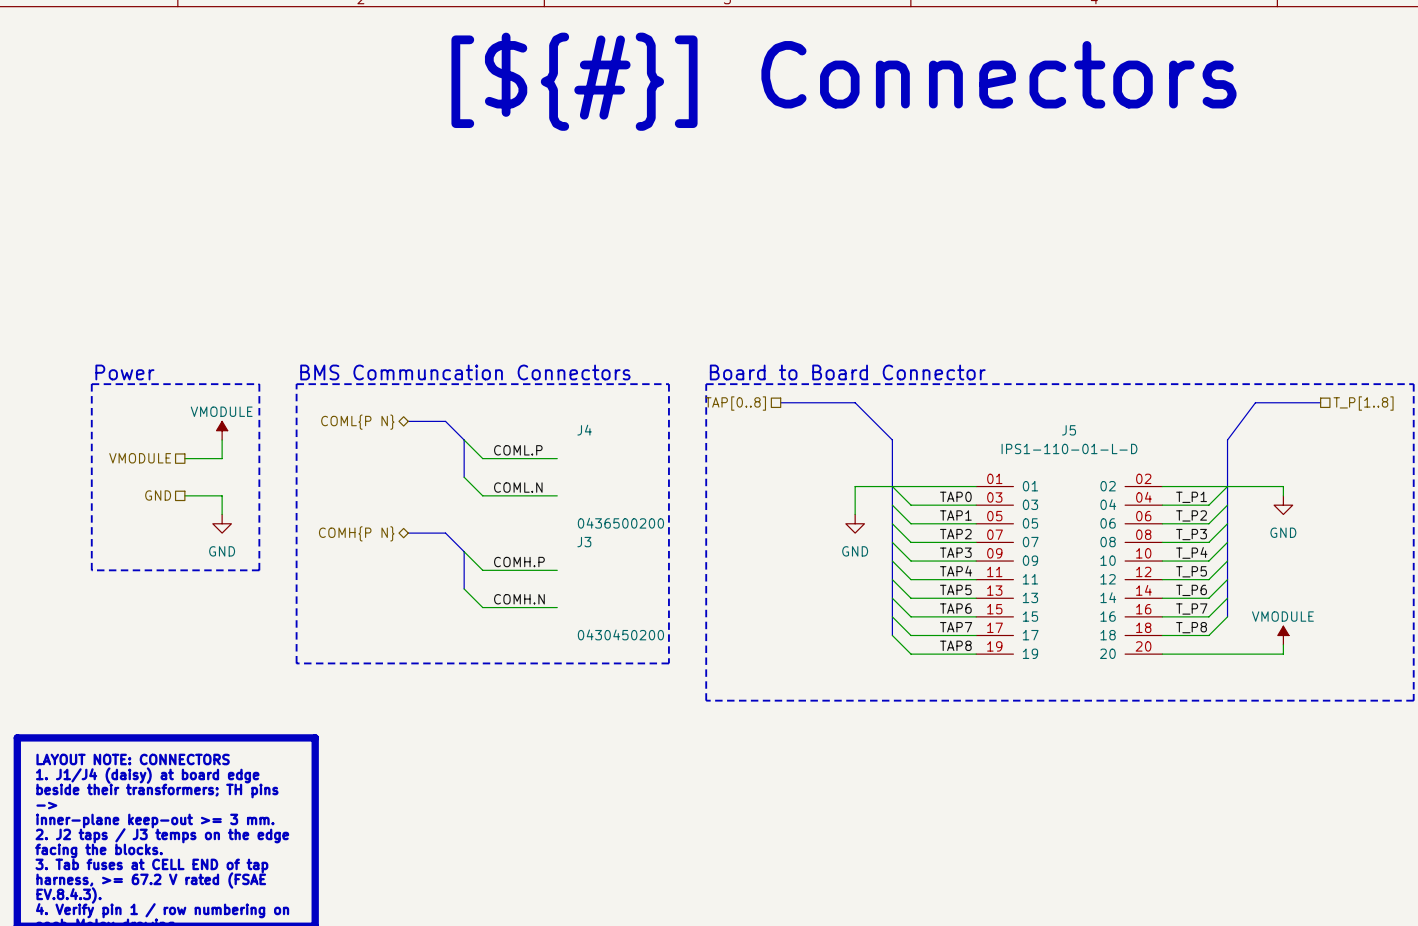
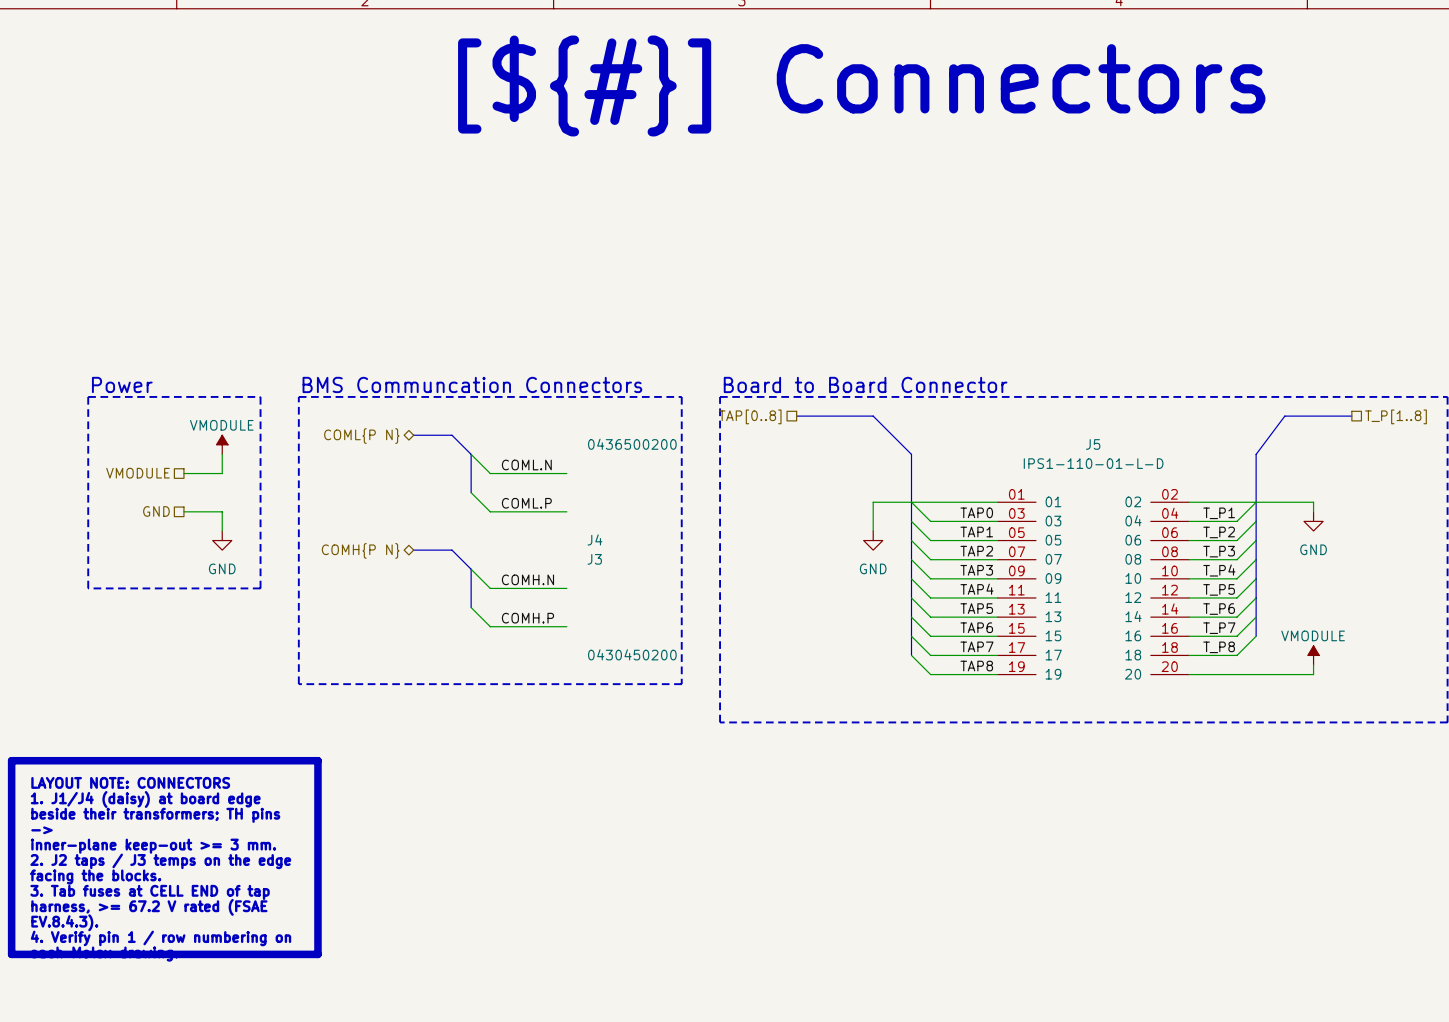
J4 name position: J4 (584, 430) -> J4 (594, 539)
label: COML.P (518, 450) -> COML.N (526, 465)
label: COML.N (518, 487) -> COML.P (526, 503)
J4 value position: 0436500200 (620, 523) -> 0436500200 (632, 444)
label: COMH.P (519, 562) -> COMH.N (527, 579)
label: COMH.N (519, 599) -> COMH.P (527, 618)

